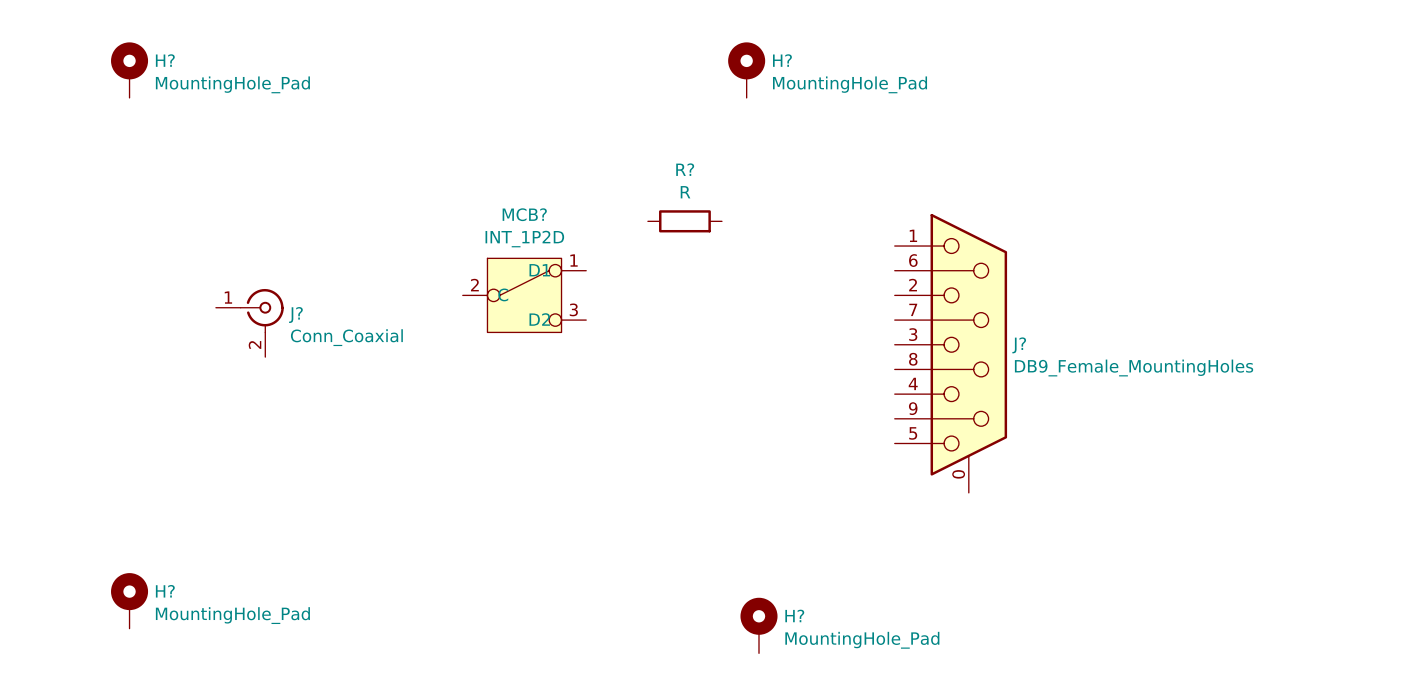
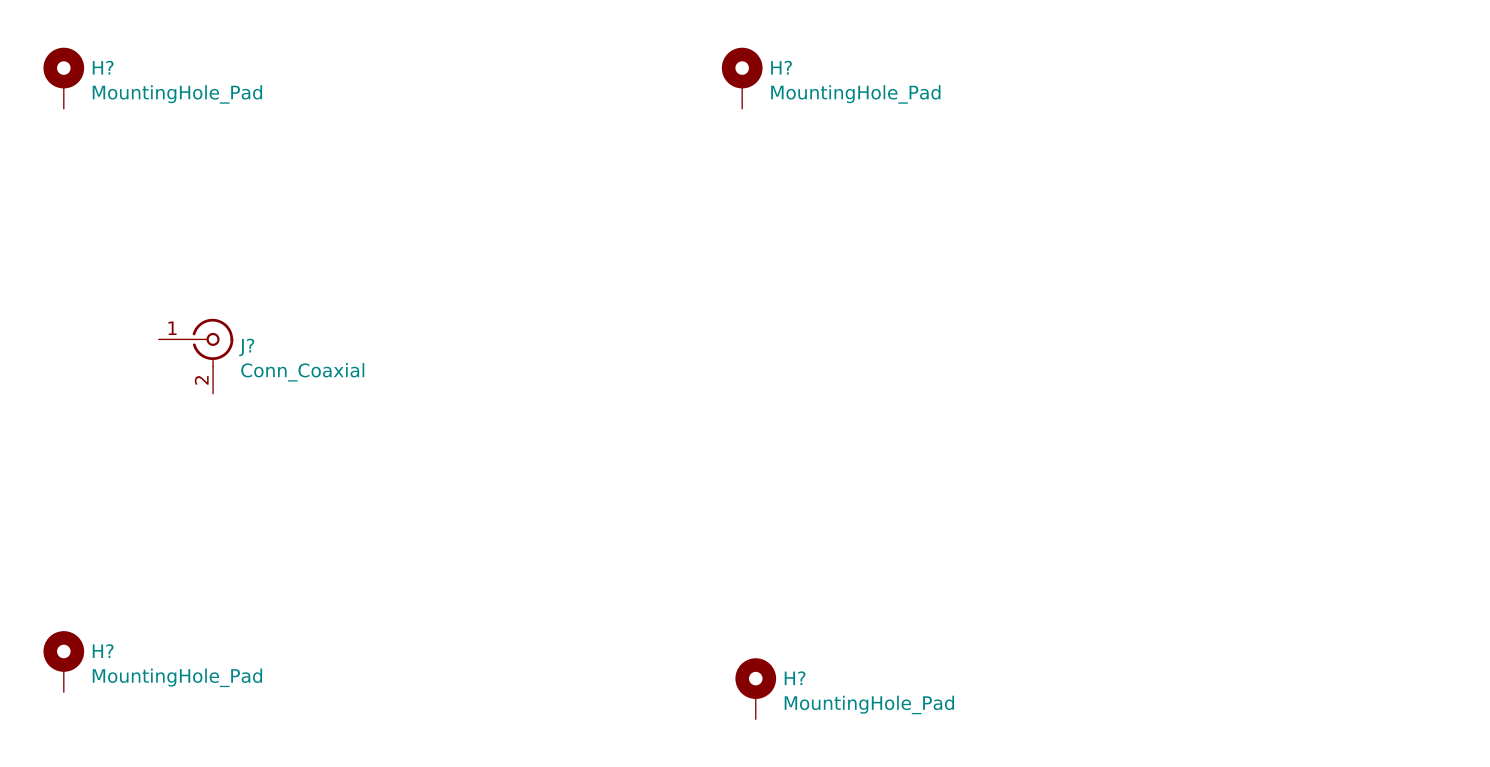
R?: R (684, 221) -> none
MCB?: INT_1P2D (524, 295) -> none
J?: DB9_Female_MountingHoles (950, 353) -> none

